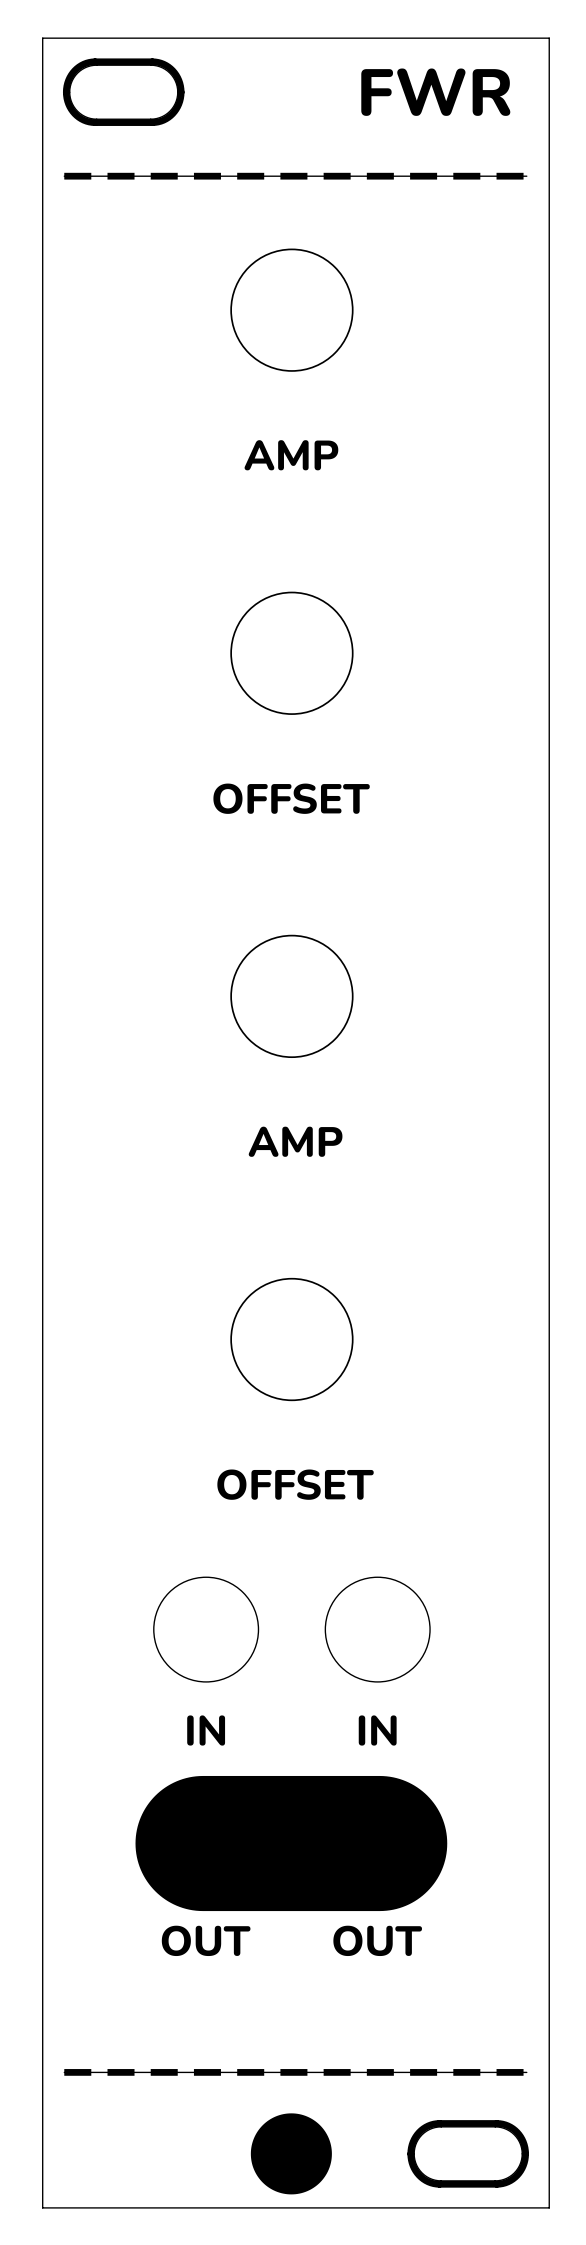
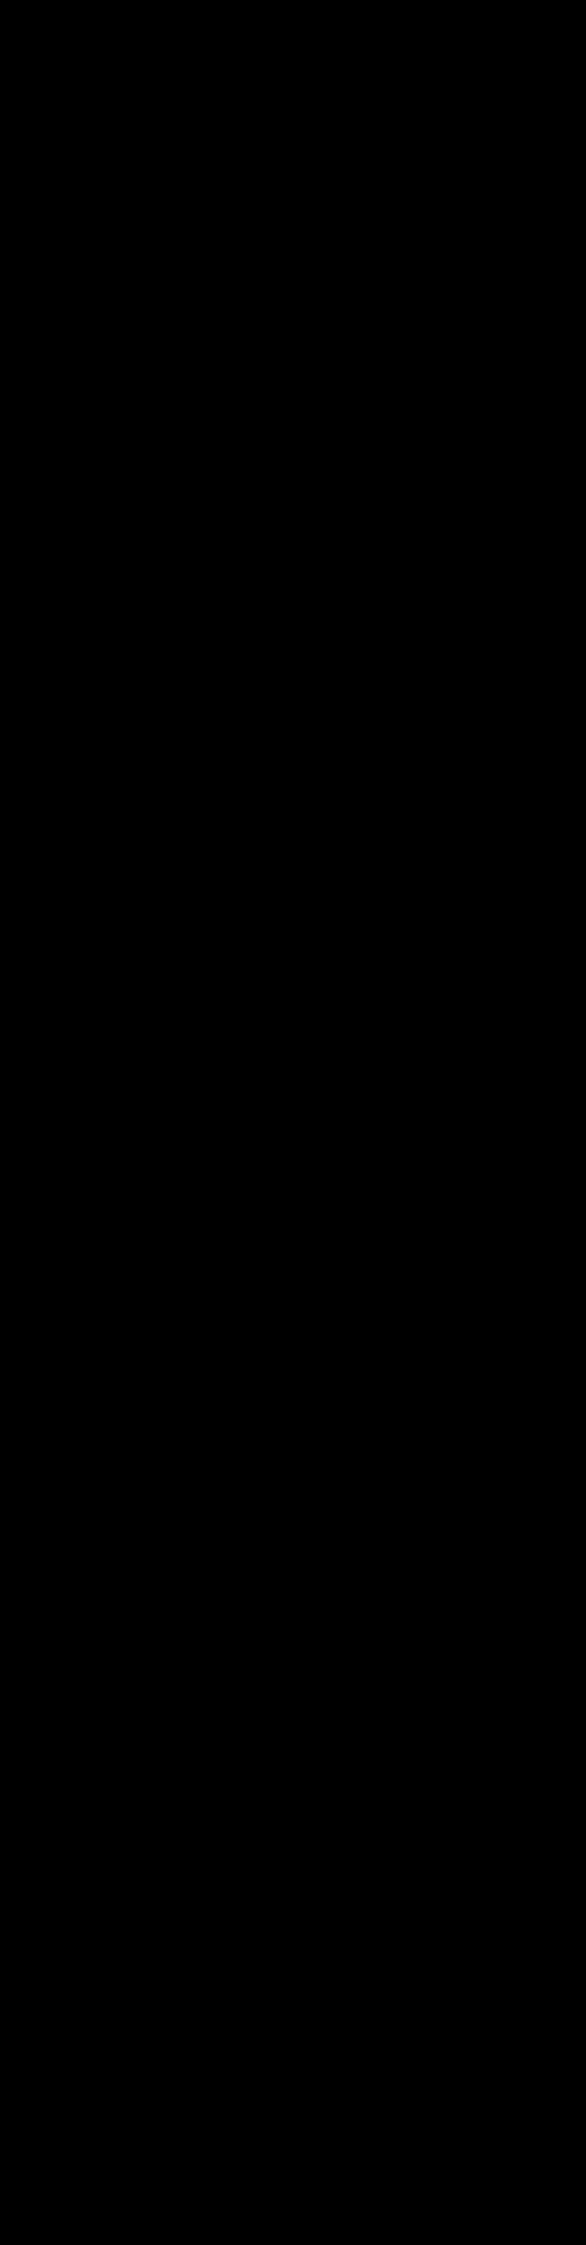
board edge: (42, 38) (549, 38) (549, 2207) (42, 2207) (42, 38) -> none
line: (95, 61) (152, 61) (166, 65) (174, 72) (179, 83) (180, 95) (177, 106) (168, 117) (155, 122) (95, 122) (81, 118) (72, 111) (68, 104) (66, 86) (69, 77) (76, 68) (86, 63) (95, 61) -> none
board edge: (96, 65) (150, 65) (162, 67) (169, 73) (176, 83) (177, 92) (175, 103) (165, 115) (153, 119) (96, 119) (85, 116) (77, 111) (72, 103) (69, 95) (70, 86) (73, 77) (79, 71) (87, 66) (96, 65) -> none
drawing: [361, 68, 511, 116] -> none
line: (64, 176) (526, 176) (64, 176) -> none
round board edge: [230, 248, 354, 372] -> none
drawing: [244, 440, 339, 471] -> none
round board edge: [230, 591, 354, 715] -> none
drawing: [213, 783, 370, 814] -> none
round board edge: [230, 934, 354, 1059] -> none
drawing: [248, 1126, 343, 1157] -> none
round board edge: [230, 1277, 354, 1402] -> none
drawing: [217, 1469, 374, 1500] -> none
round board edge: [153, 1576, 259, 1683] -> none
round board edge: [324, 1576, 431, 1683] -> none
drawing: [187, 1715, 226, 1746] -> none
drawing: [358, 1715, 397, 1746] -> none
drawing: [135, 1775, 448, 1957] -> none
line: (64, 2072) (526, 2072) (64, 2072) -> none
drawing: [250, 2113, 332, 2195] -> none
line: (439, 2123) (496, 2123) (510, 2127) (519, 2134) (524, 2144) (525, 2156) (522, 2168) (512, 2179) (499, 2184) (439, 2184) (425, 2180) (417, 2173) (413, 2165) (411, 2147) (414, 2139) (421, 2130) (430, 2124) (439, 2123) -> none
board edge: (441, 2126) (495, 2126) (506, 2129) (514, 2134) (520, 2144) (522, 2153) (519, 2165) (509, 2176) (498, 2180) (441, 2180) (429, 2178) (422, 2172) (416, 2165) (414, 2156) (414, 2147) (418, 2139) (424, 2132) (432, 2128) (441, 2126) -> none

